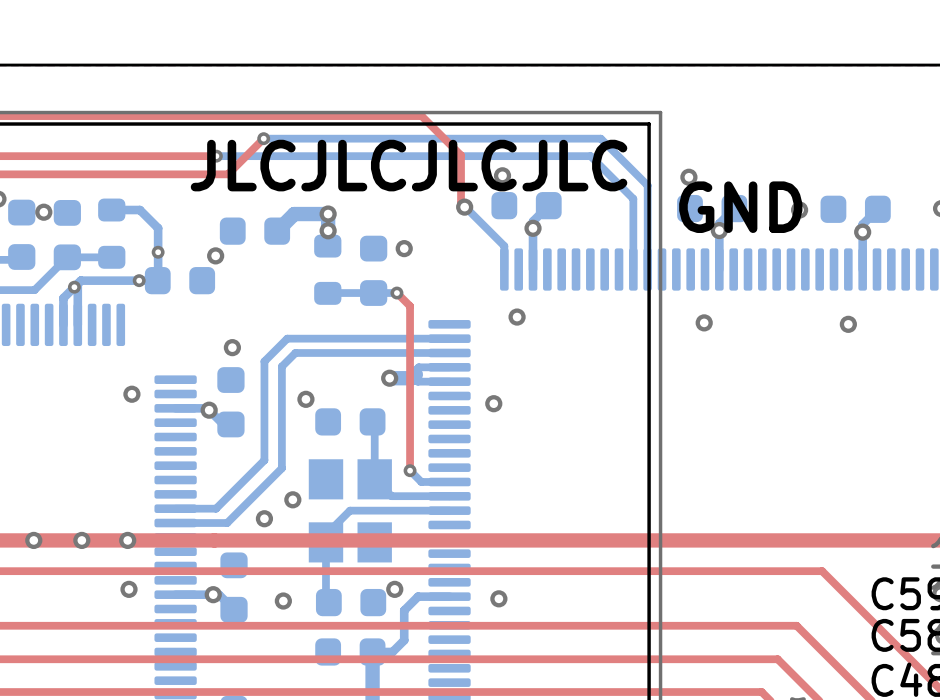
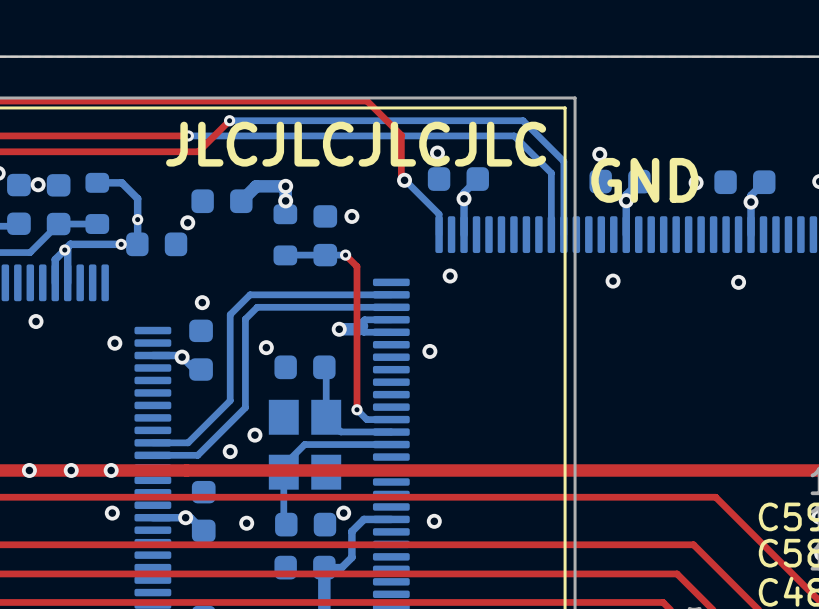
via: none -> (36, 321)

